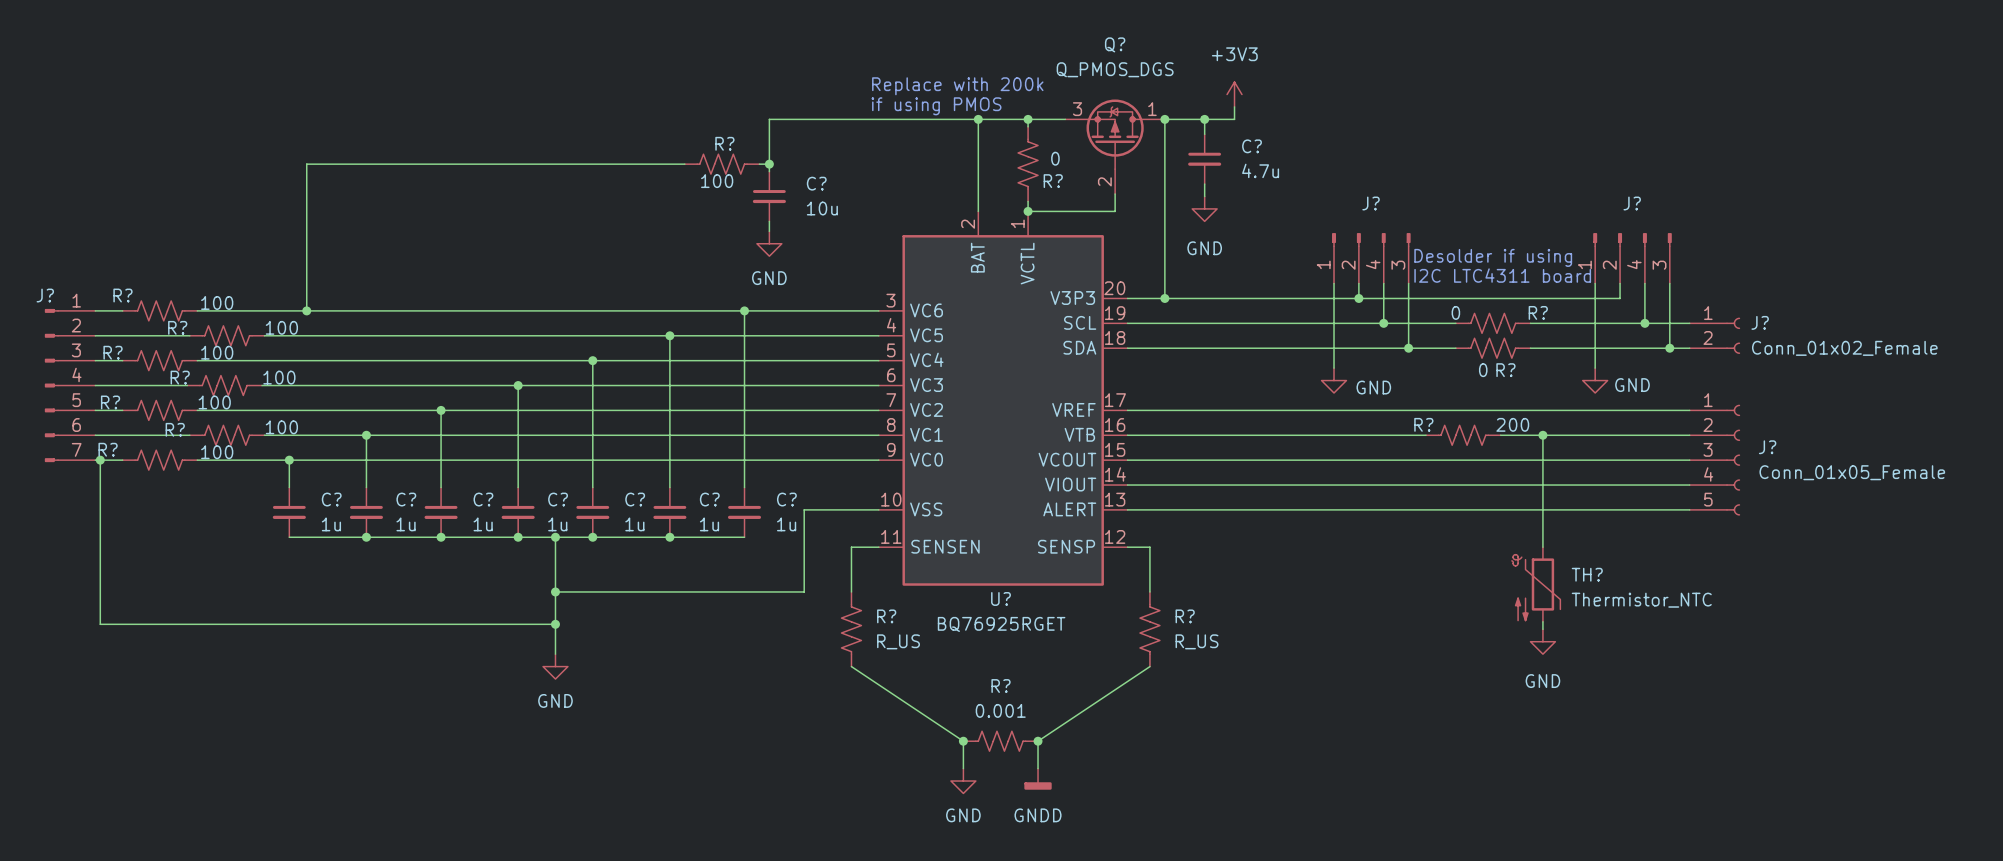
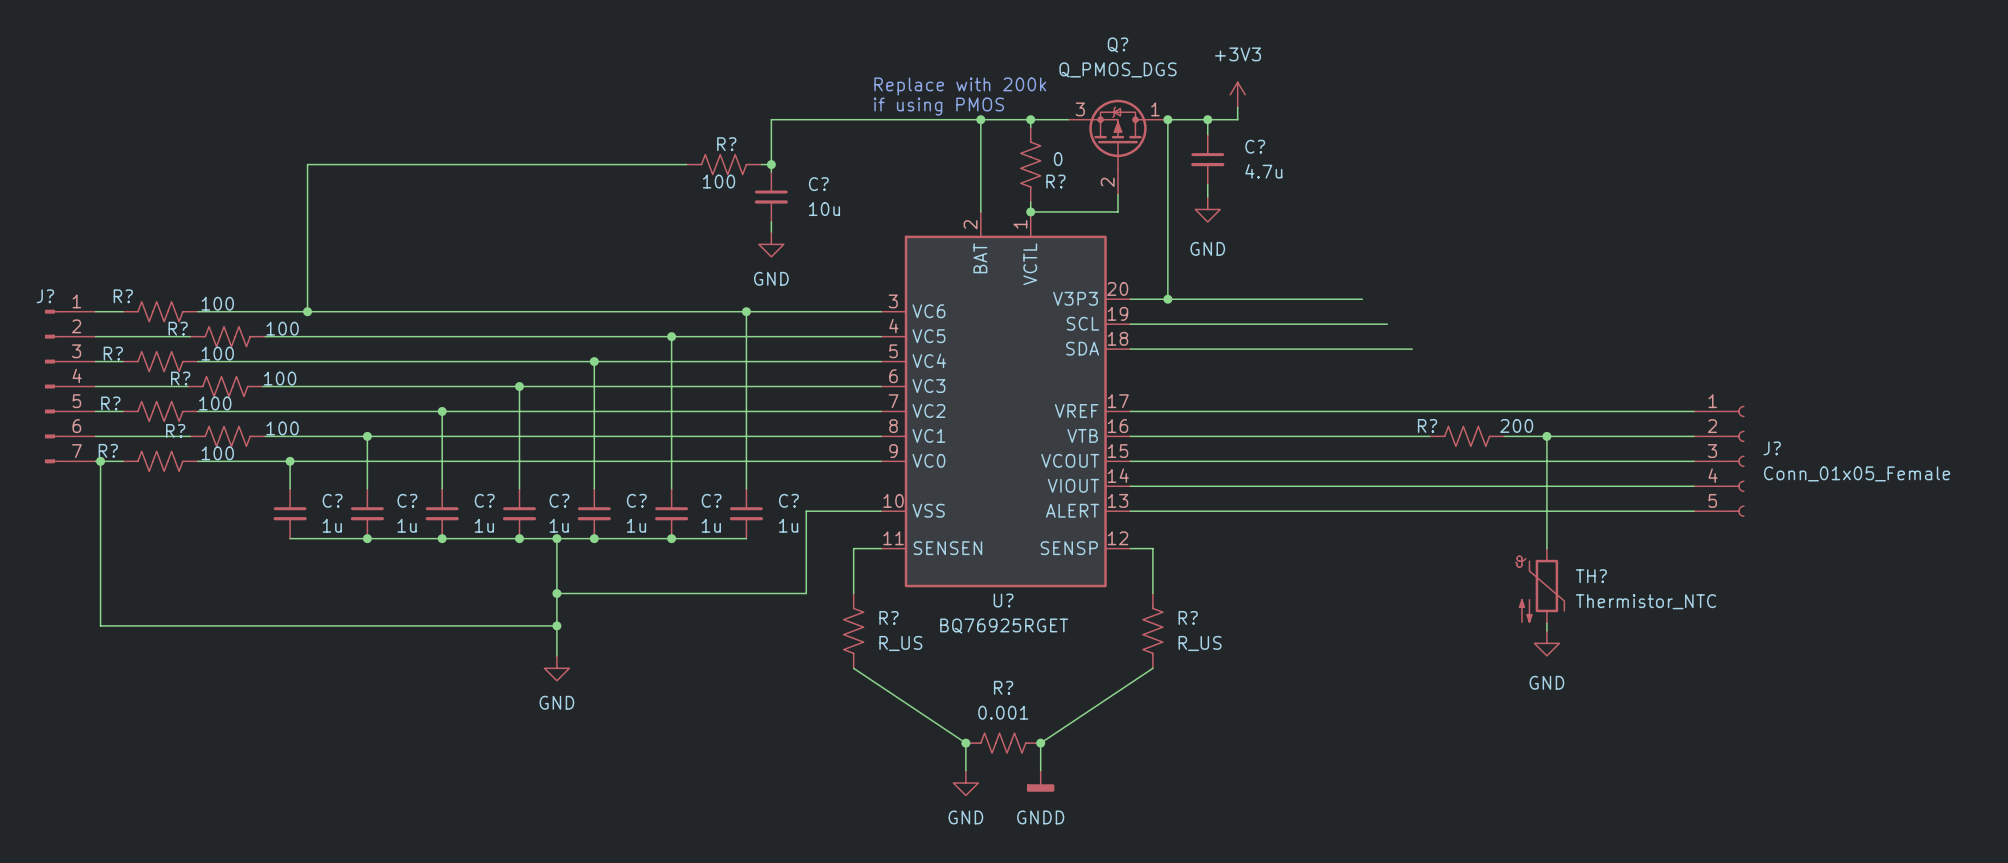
text: Desolder if using (1493, 257) -> none
J?: (1371, 258) -> none
J?: (1632, 258) -> none
text: I2C LTC4311 board (1502, 275) -> none
wire: (1334, 283) (1334, 368) -> none
wire: (1358, 283) (1358, 298) (1620, 298) (1620, 283) -> none
wire: (1383, 283) (1383, 323) (1455, 323) -> none
wire: (1408, 283) (1408, 348) (1455, 348) -> none
wire: (1595, 283) (1595, 368) -> none
wire: (1644, 283) (1644, 323) -> none
wire: (1669, 283) (1669, 348) -> none
junction: (1358, 298) -> none
junction: (1383, 323) -> none
R?: 0 (1493, 323) -> none
wire: (1530, 323) (1689, 323) -> none
junction: (1644, 323) -> none
J?: Conn_01x02_Female (1714, 335) -> none
junction: (1408, 348) -> none
R?: 0 (1493, 348) -> none
wire: (1530, 348) (1689, 348) -> none
junction: (1669, 348) -> none
power symbol: GND (1334, 380) -> none
power symbol: GND (1595, 380) -> none

